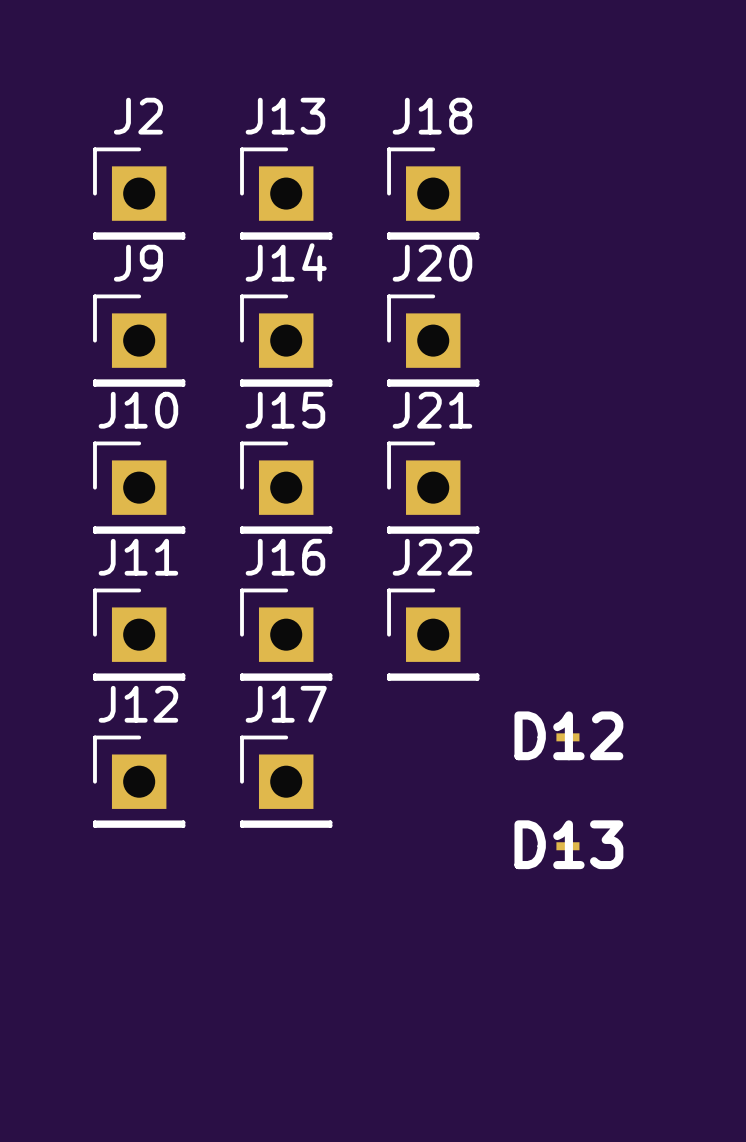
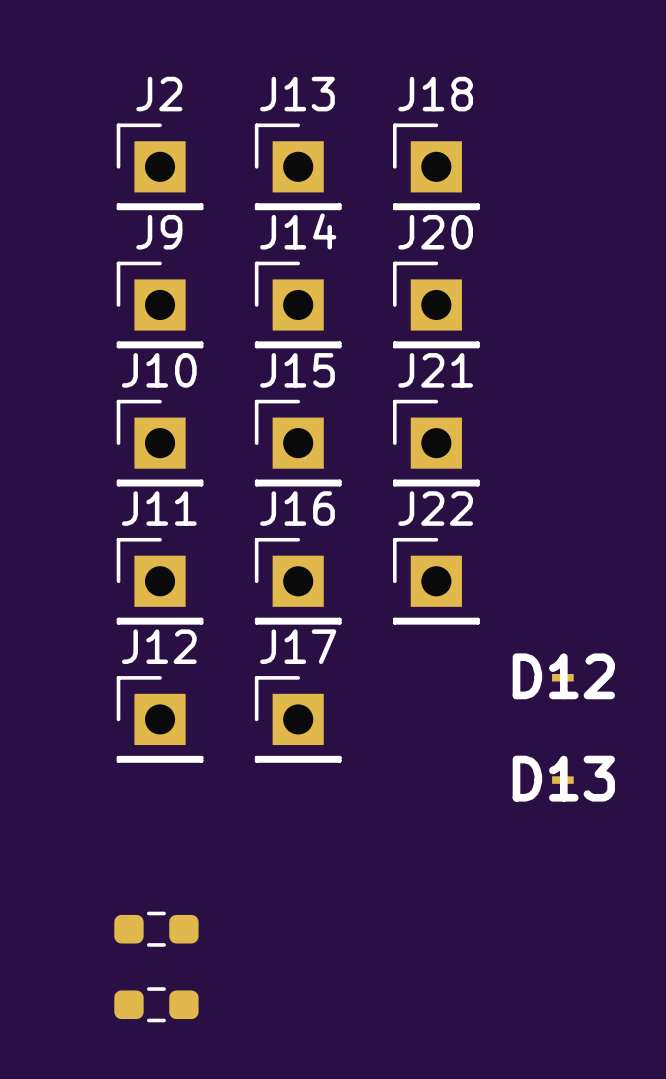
part: none -> (156, 929)
part: none -> (156, 1004)

